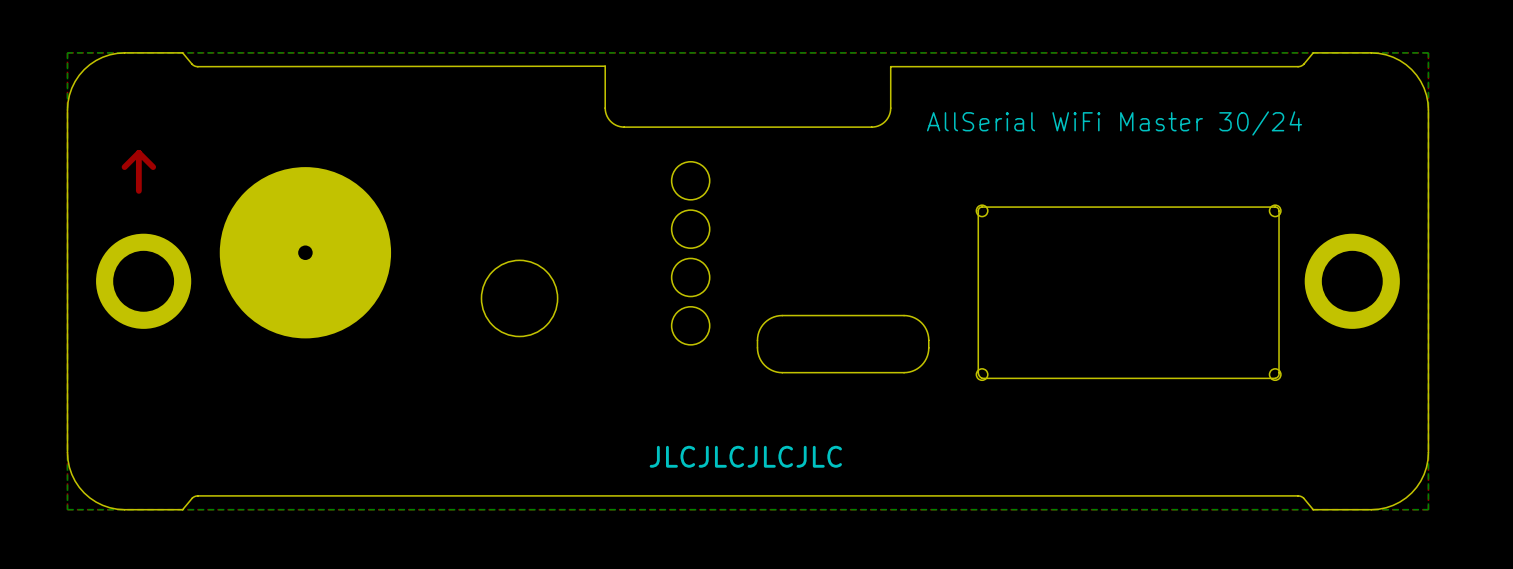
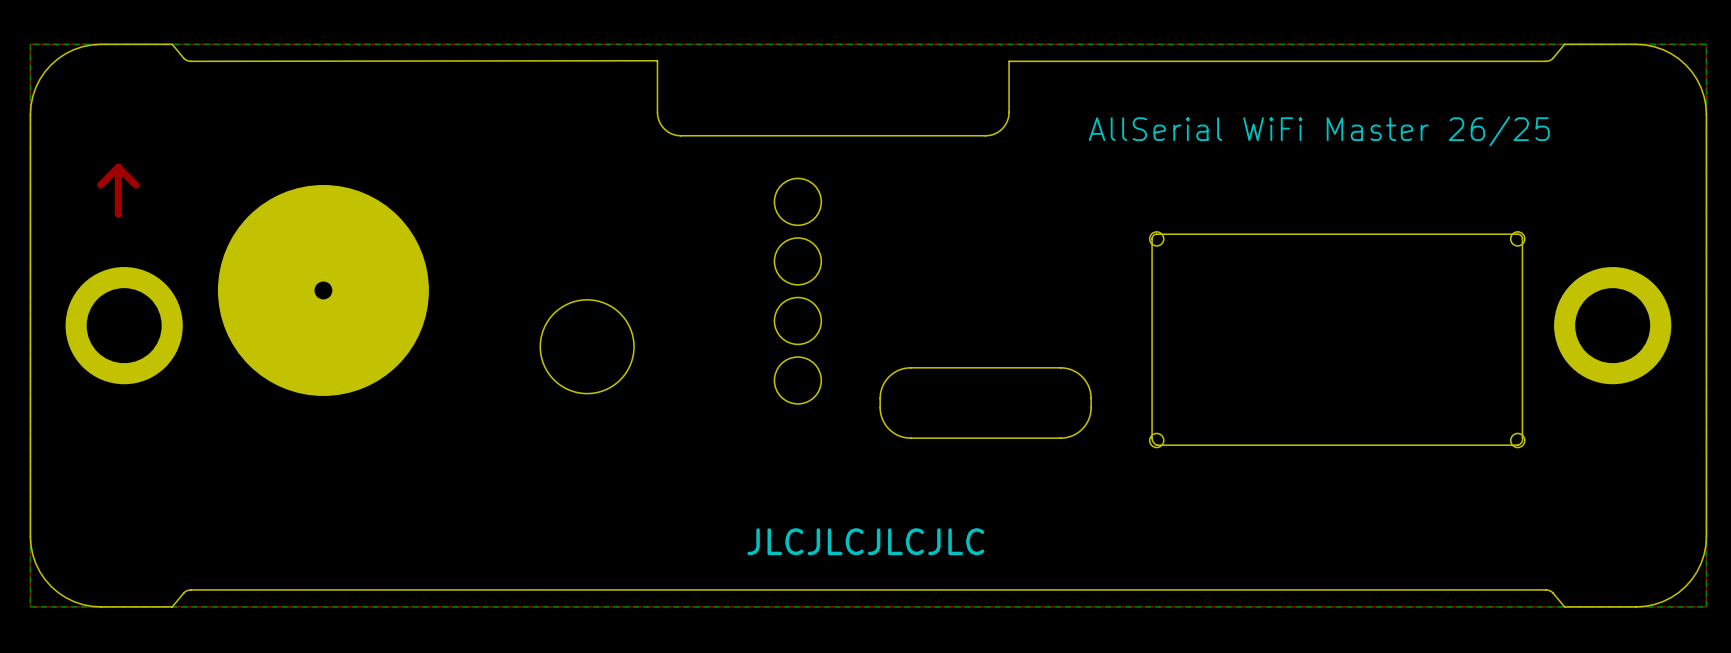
part footprint: [67, 52, 1429, 511] -> [29, 43, 1708, 608]
text: AllSerial WiFi Master 30/24 (1114, 123) -> AllSerial WiFi Master 26/25 (1319, 131)

